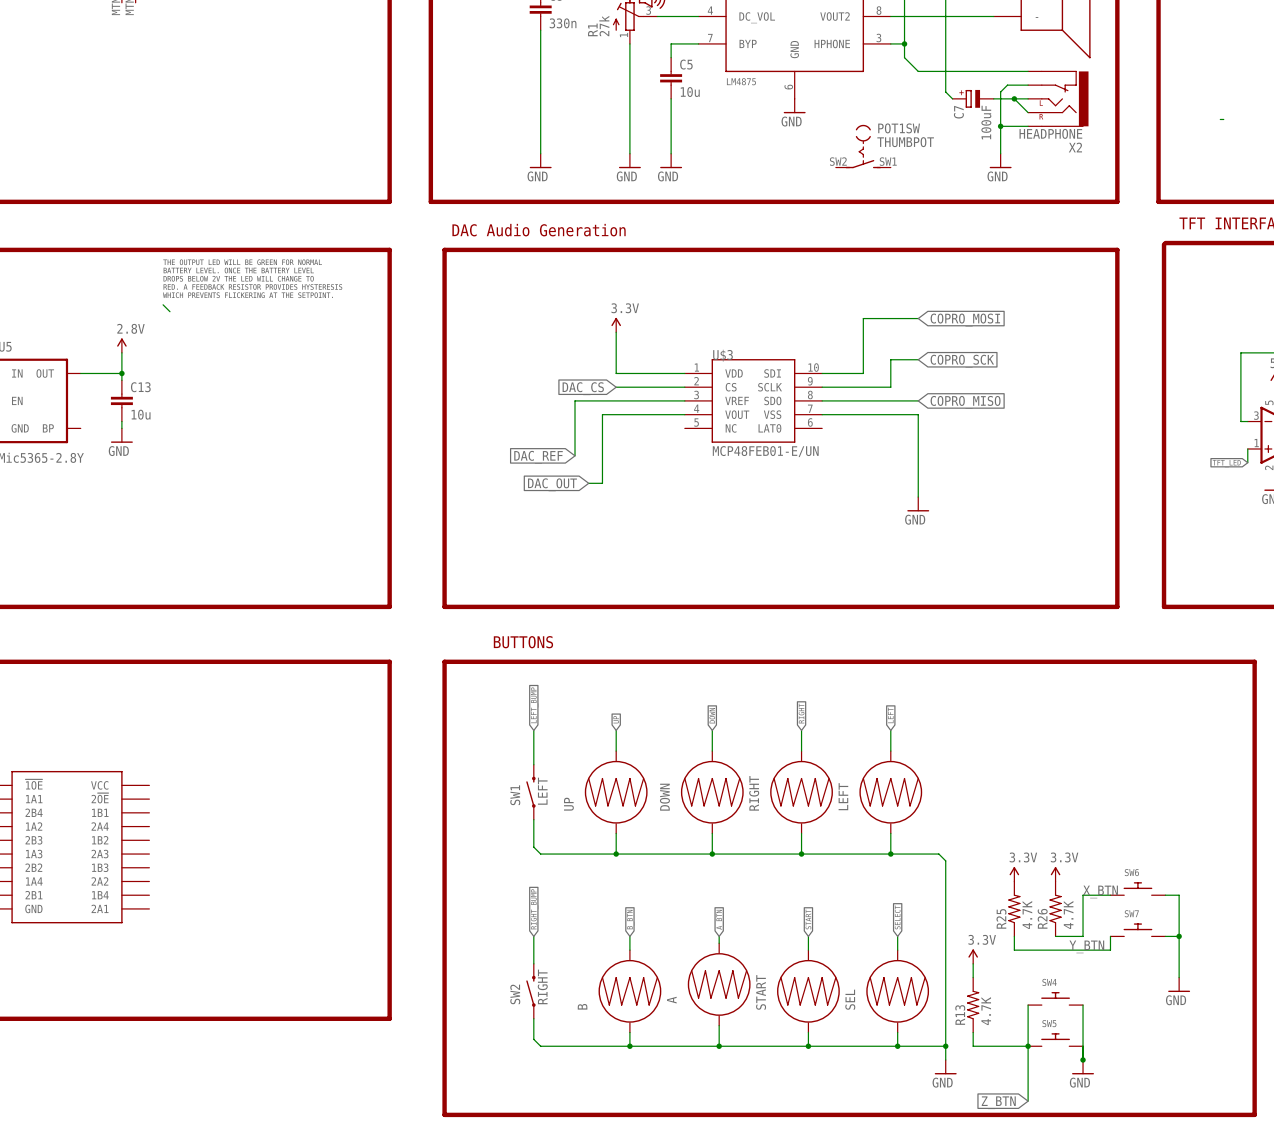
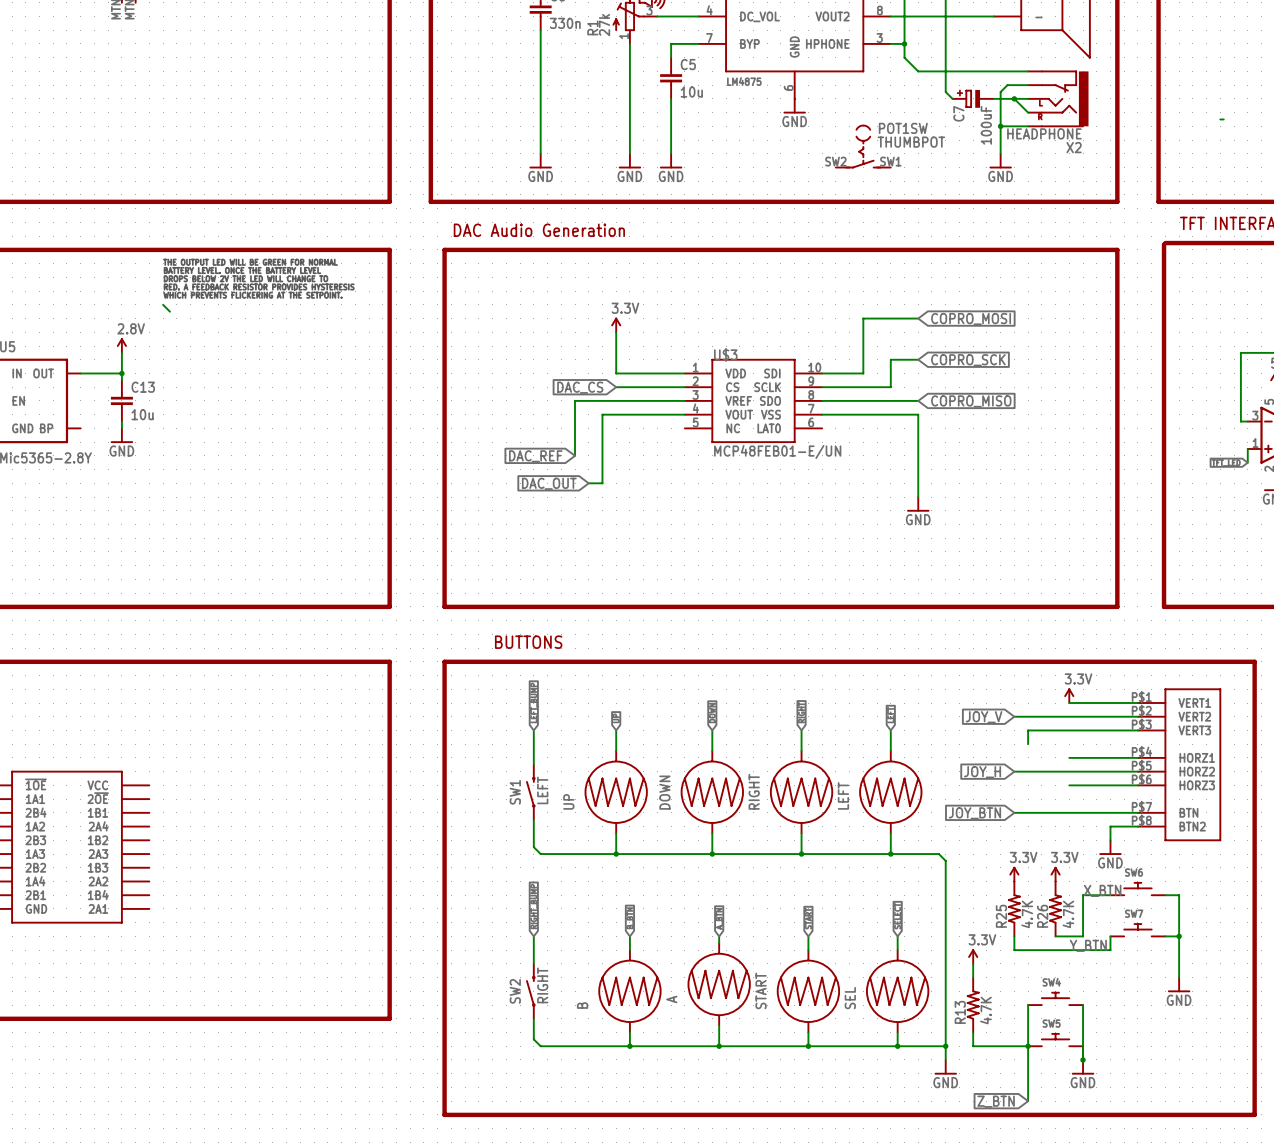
power symbol: none -> 3.3V (1069, 695)
wire: none -> (1069, 703) (1137, 703)
wire: none -> (1014, 716) (1137, 716)
global label: none -> JOY_V (984, 717)
wire: none -> (1137, 730) (1028, 730) (1028, 744)
wire: none -> (1069, 757) (1137, 757)
part: none -> (1179, 764)
wire: none -> (1014, 771) (1137, 771)
global label: none -> JOY_H (982, 772)
wire: none -> (1069, 785) (1137, 785)
wire: none -> (1014, 812) (1137, 812)
global label: none -> JOY_BTN (974, 813)
wire: none -> (1137, 826) (1110, 826) (1110, 840)
power symbol: none -> GND (1110, 847)

